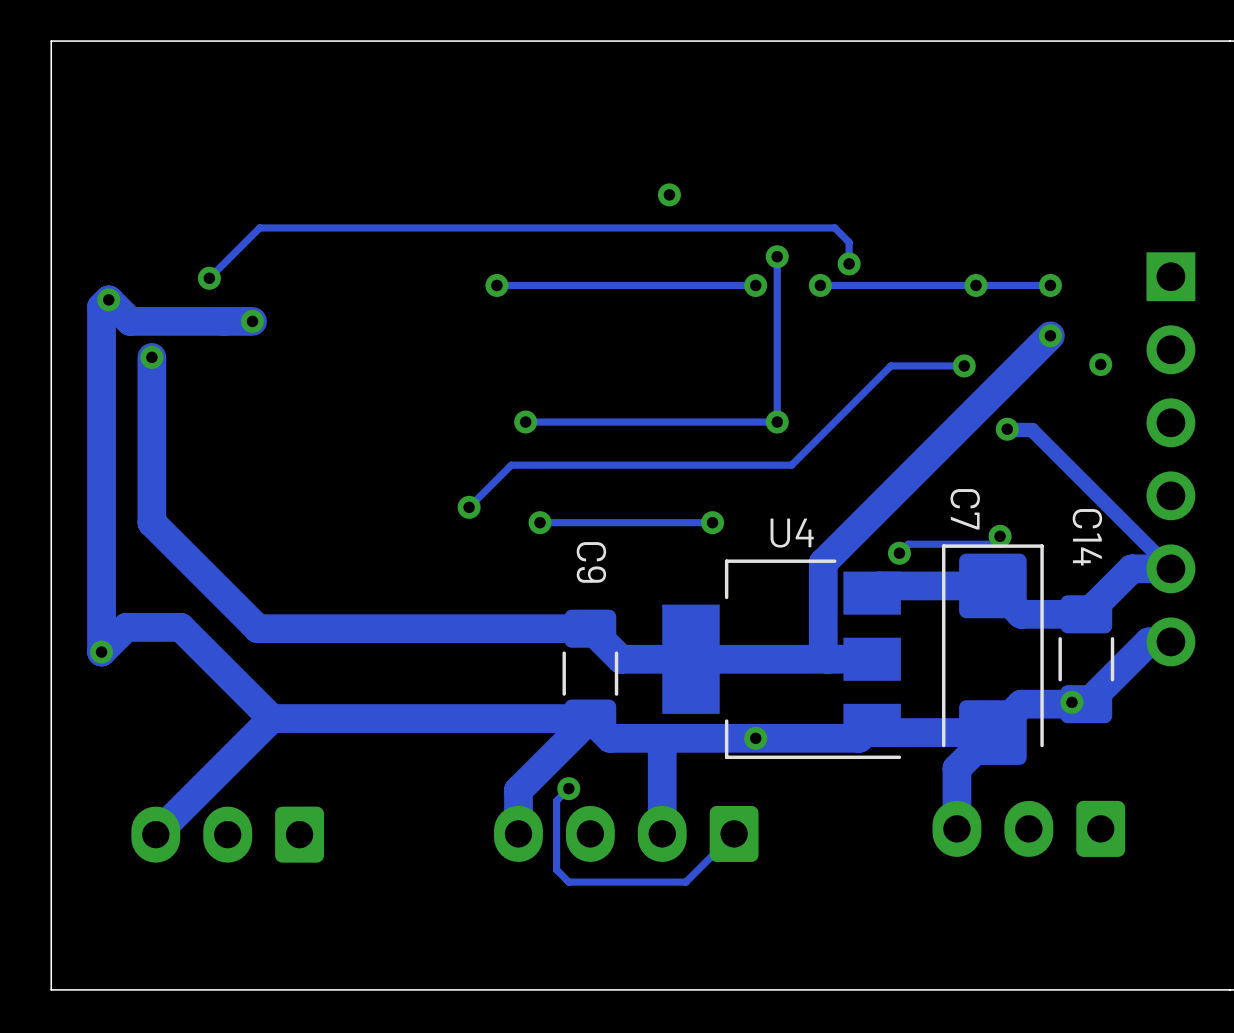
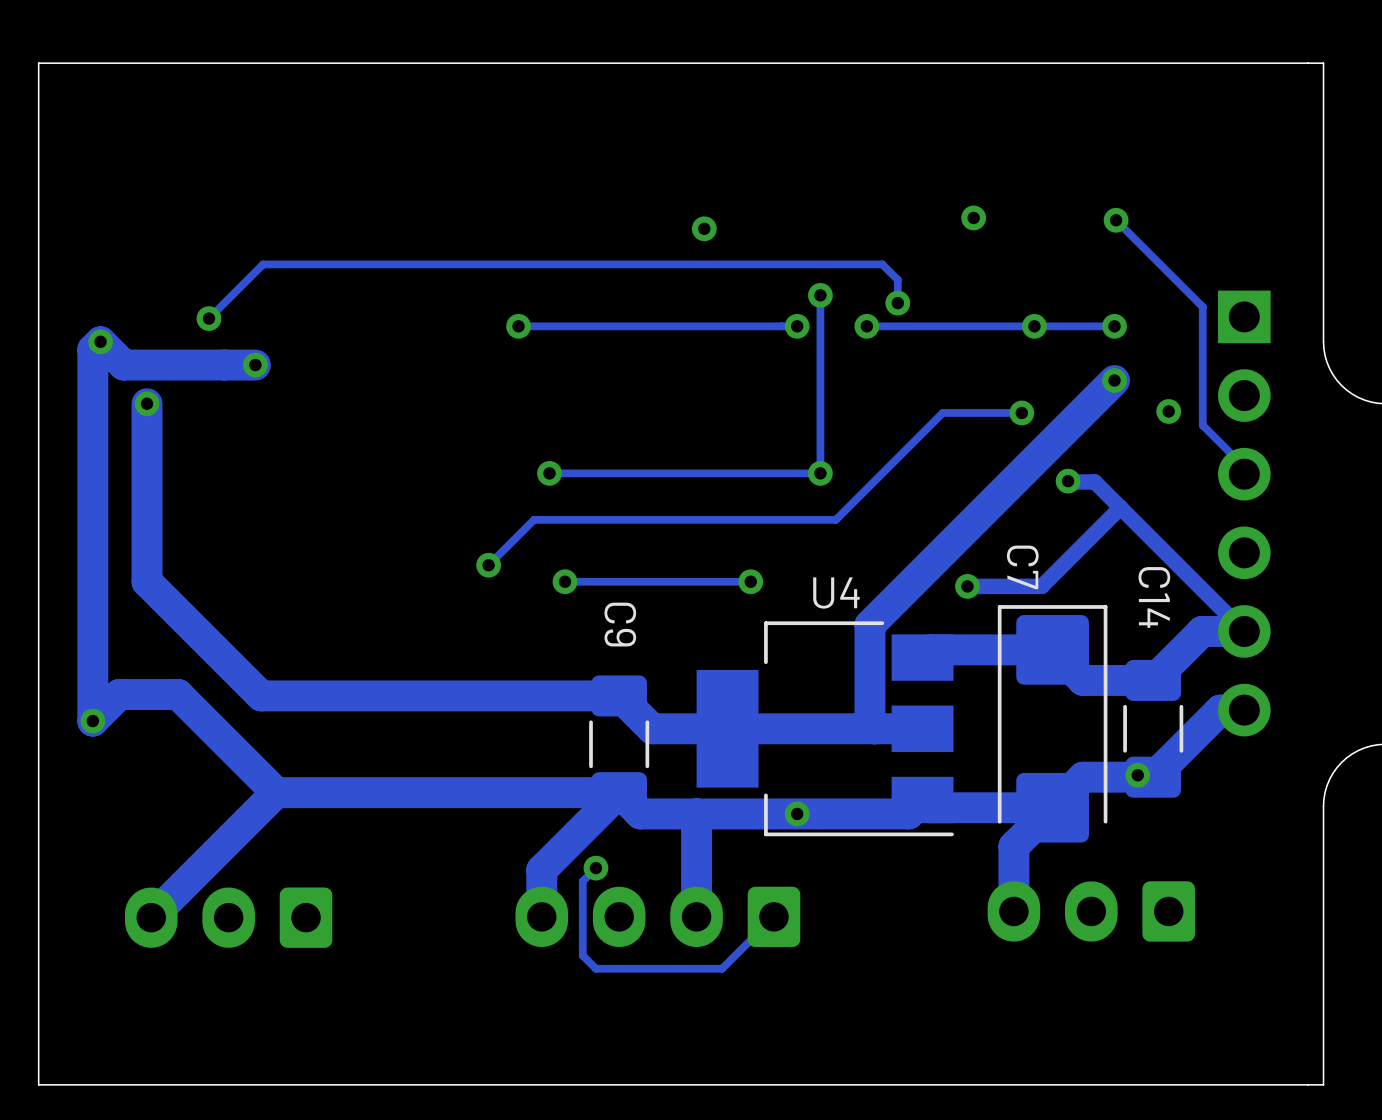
via: none -> (973, 217)
track: none -> (1116, 220) (1202, 306) (1202, 425) (1244, 466) (1244, 474)
via: none -> (1116, 220)
track: none -> (1120, 507) (1041, 586) (967, 586)
track: (1000, 536) (992, 544) (908, 544) (899, 553) -> none
via: (1000, 536) -> none
via position: (899, 553) -> (967, 586)

